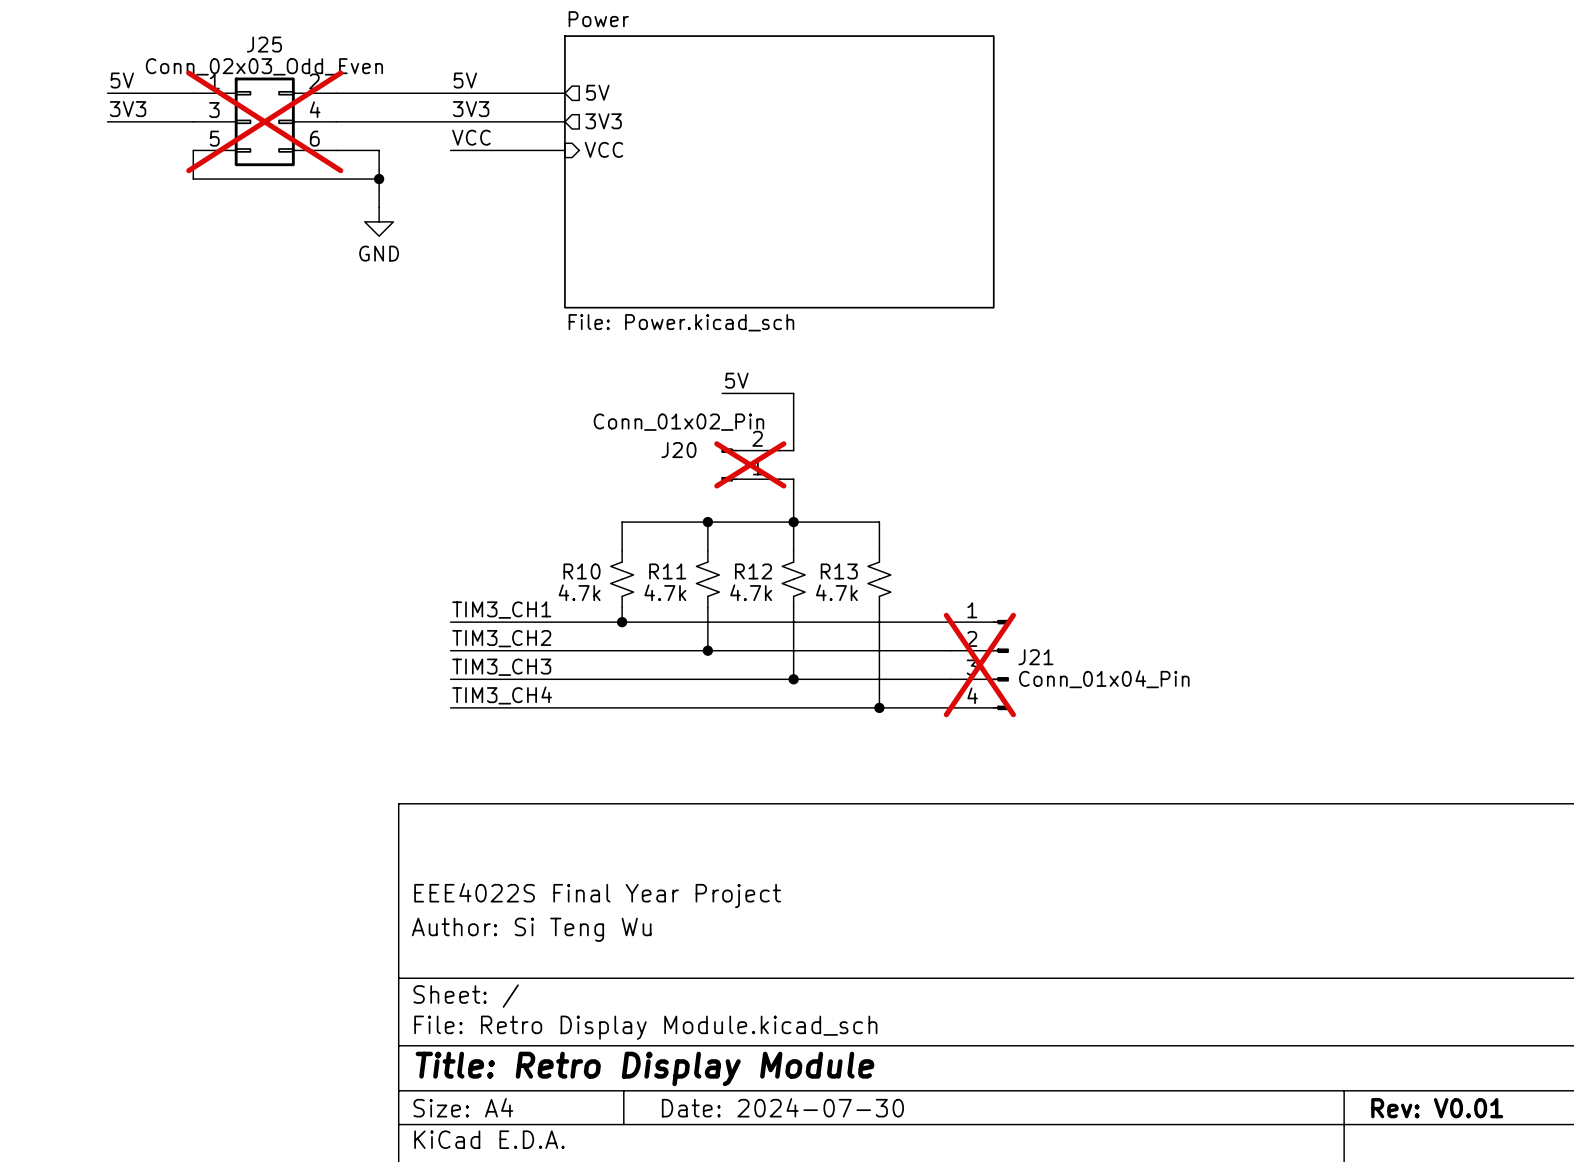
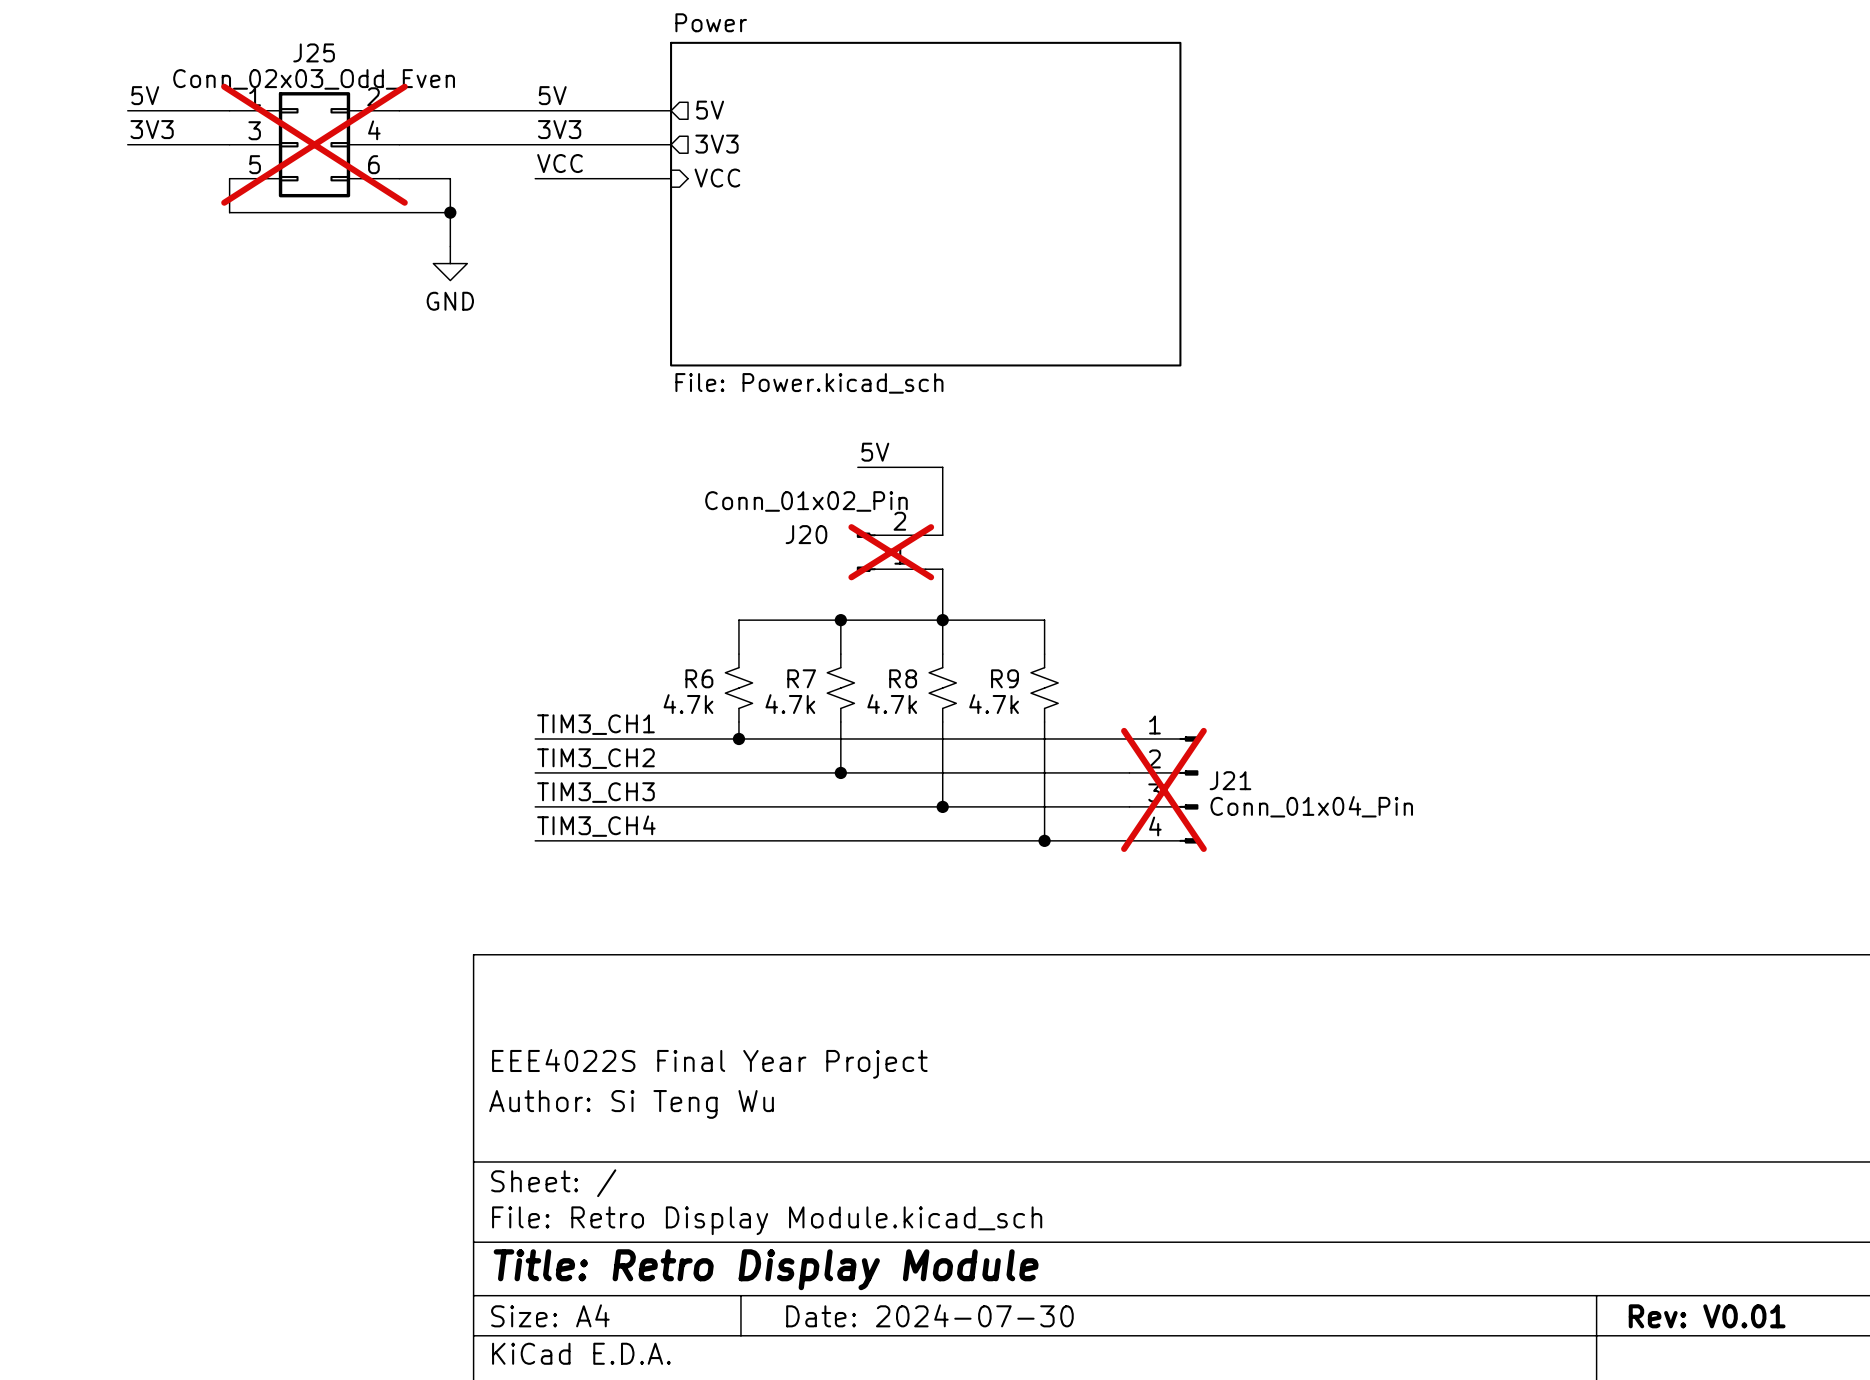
R10 name: R10 (581, 571) -> R6 (699, 678)
R11 name: R11 (667, 571) -> R7 (801, 678)
R12 name: R12 (753, 571) -> R8 (903, 678)
R13 name: R13 (839, 571) -> R9 (1005, 678)

